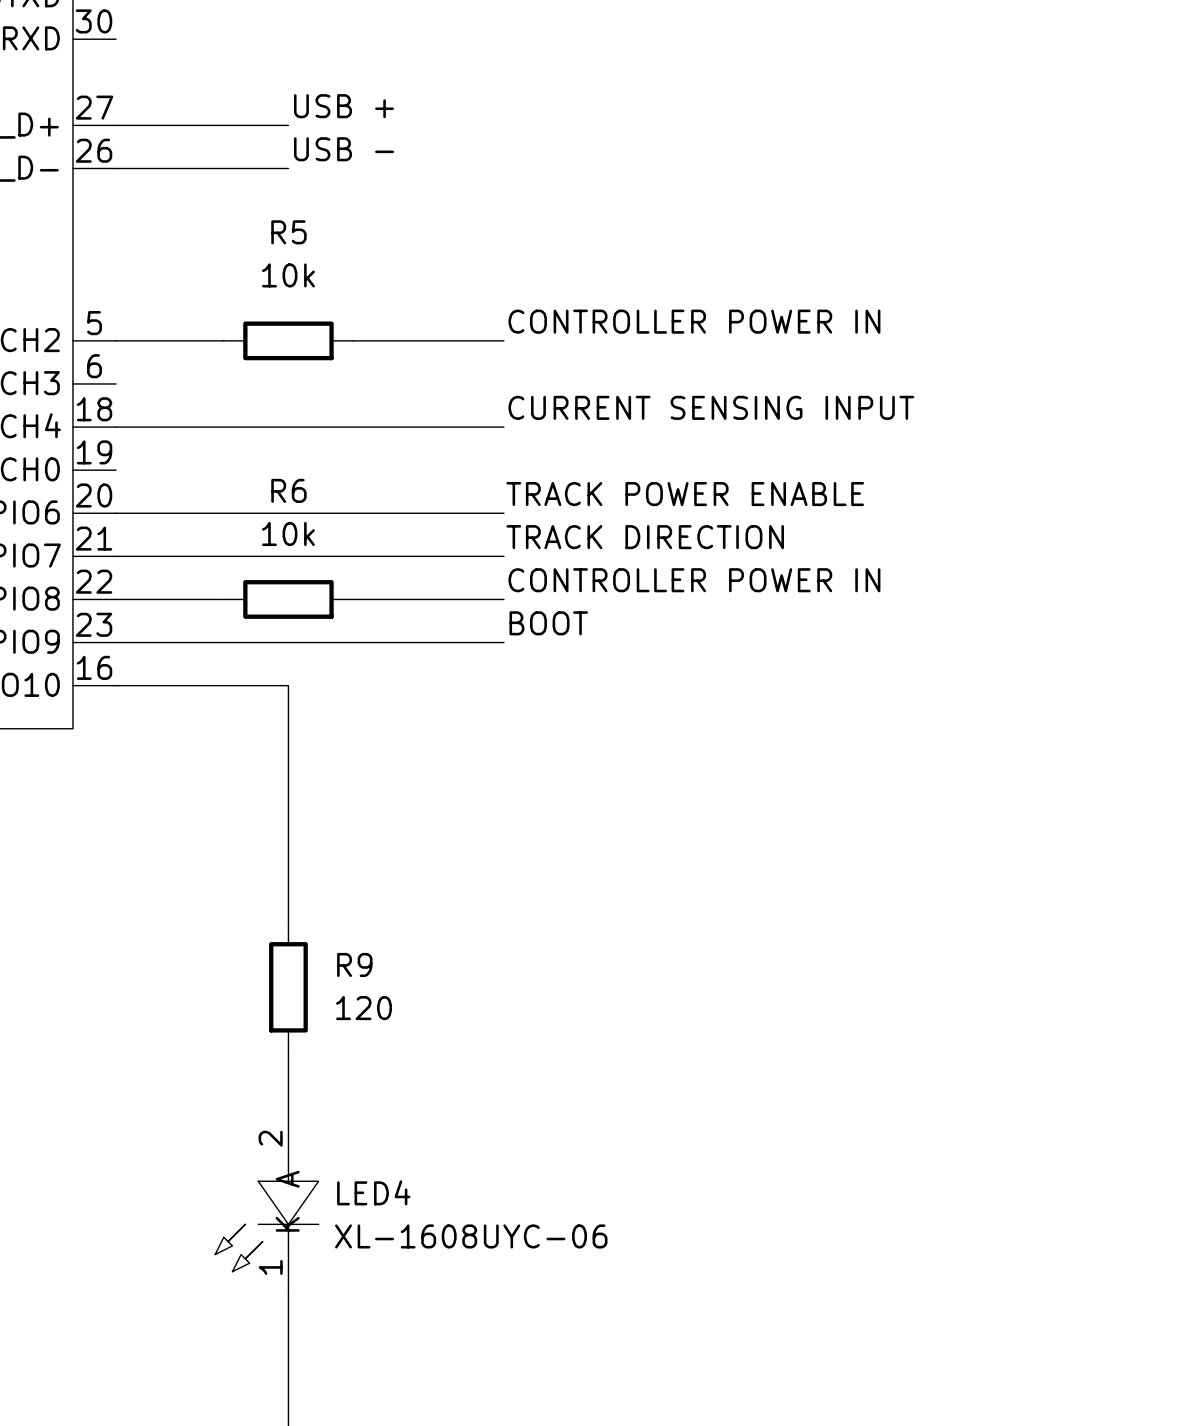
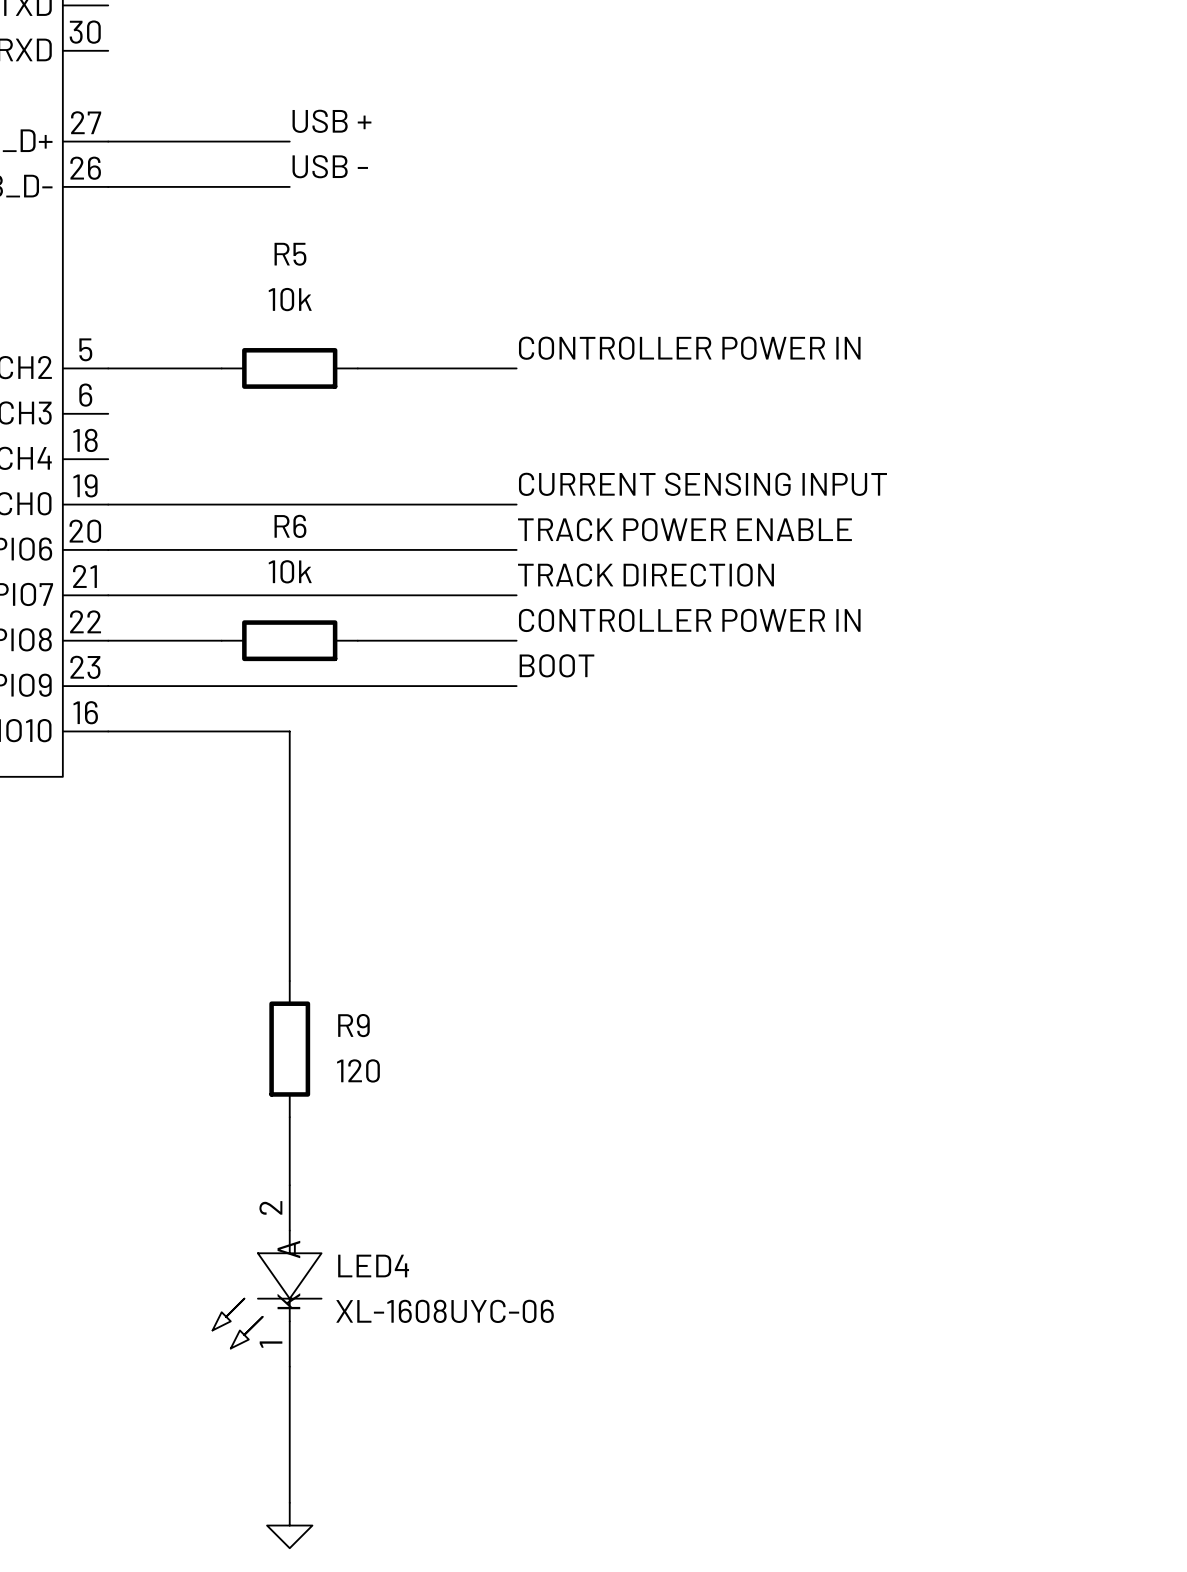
label position: CURRENT SENSING INPUT (711, 407) -> CURRENT SENSING INPUT (702, 484)
wire: (116, 427) (503, 427) -> (108, 504) (516, 504)

